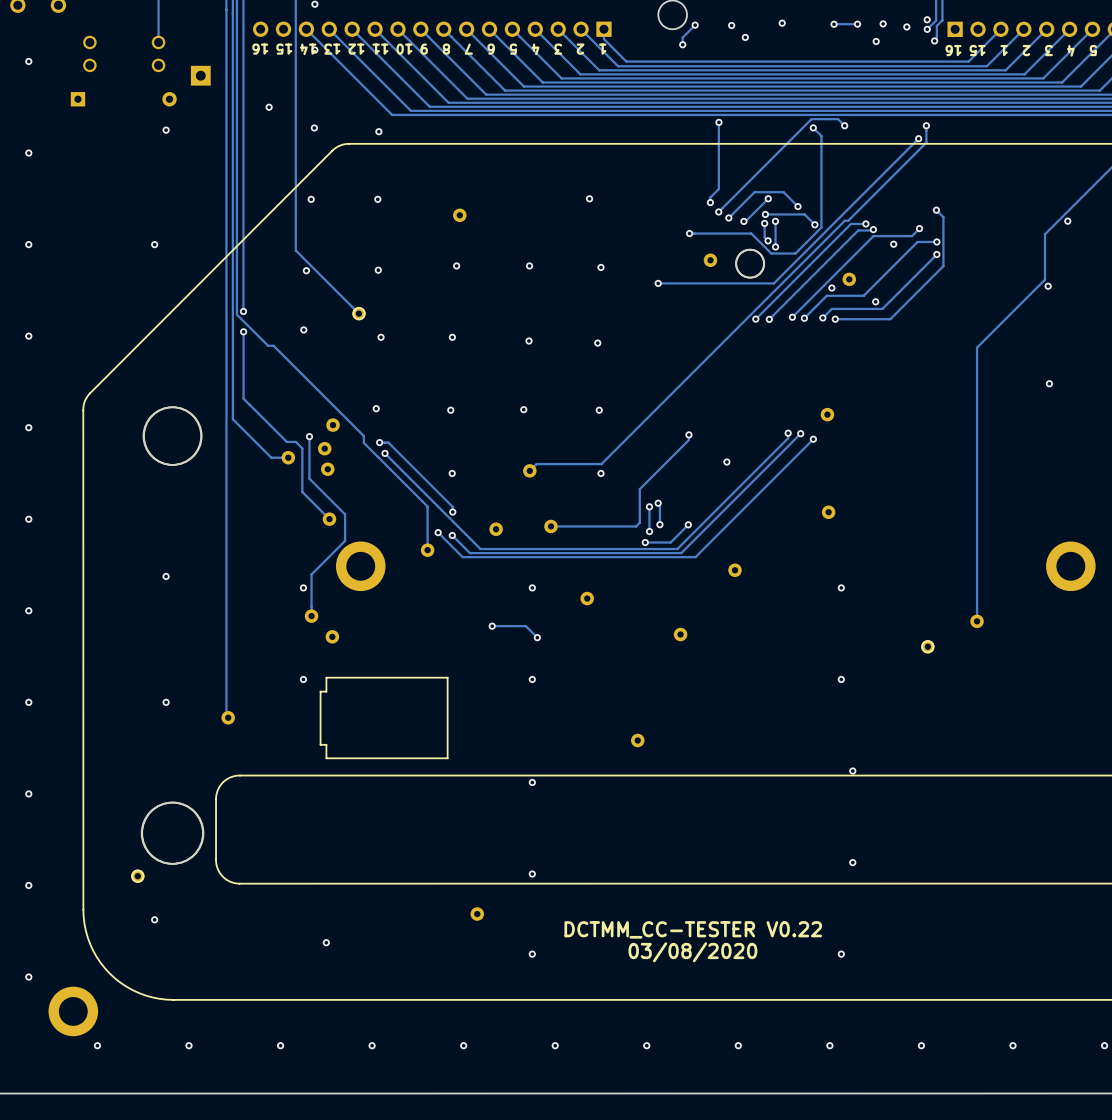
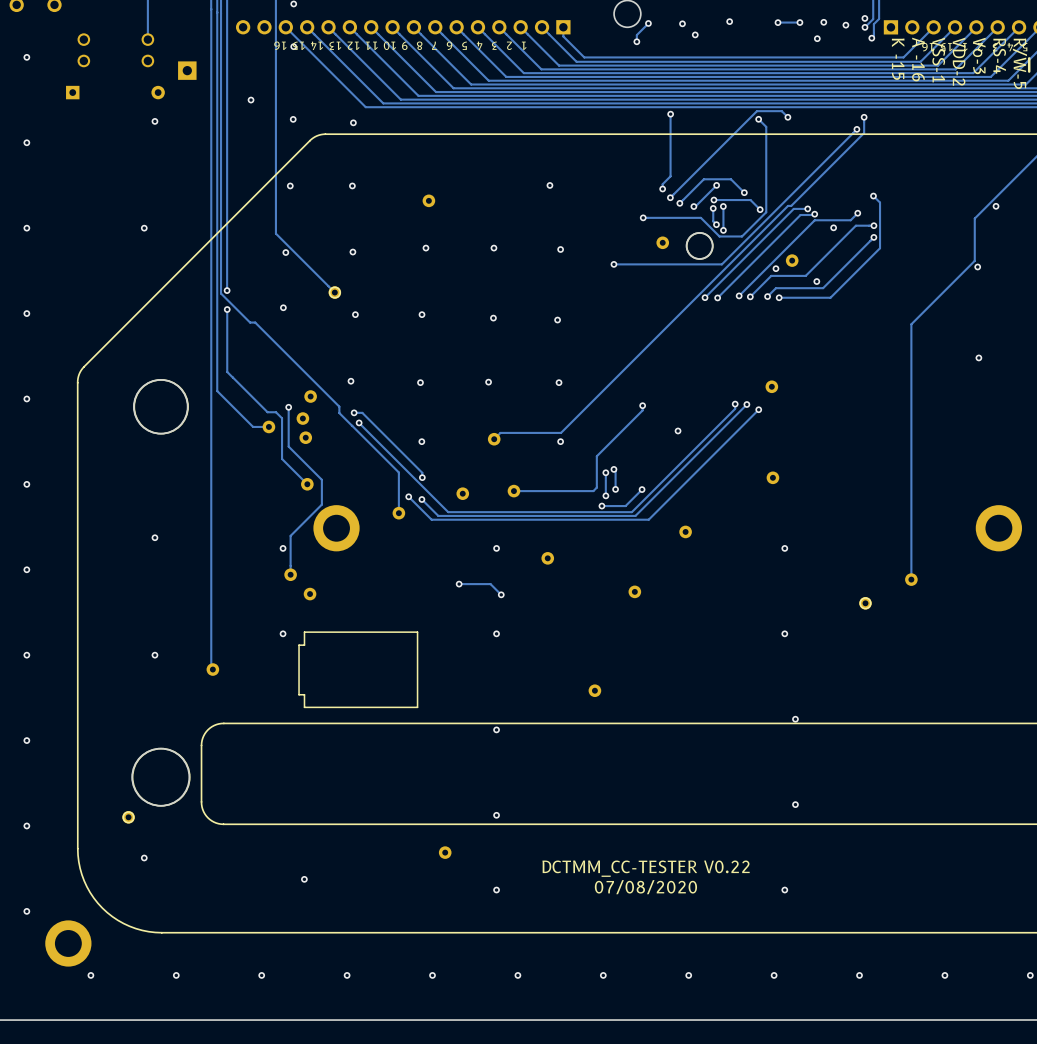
text: none -> Vo-3 (979, 55)
text: none -> RS-4 (999, 56)
text: none -> A -16 (918, 59)
text: none -> VSS-1 (938, 60)
text: none -> K -15 (898, 59)
text: none -> VDD-2 (959, 61)
text: none -> R/~{W}-5 (1021, 63)
text: 03/08/2020 (692, 952) -> 07/08/2020 (645, 887)

